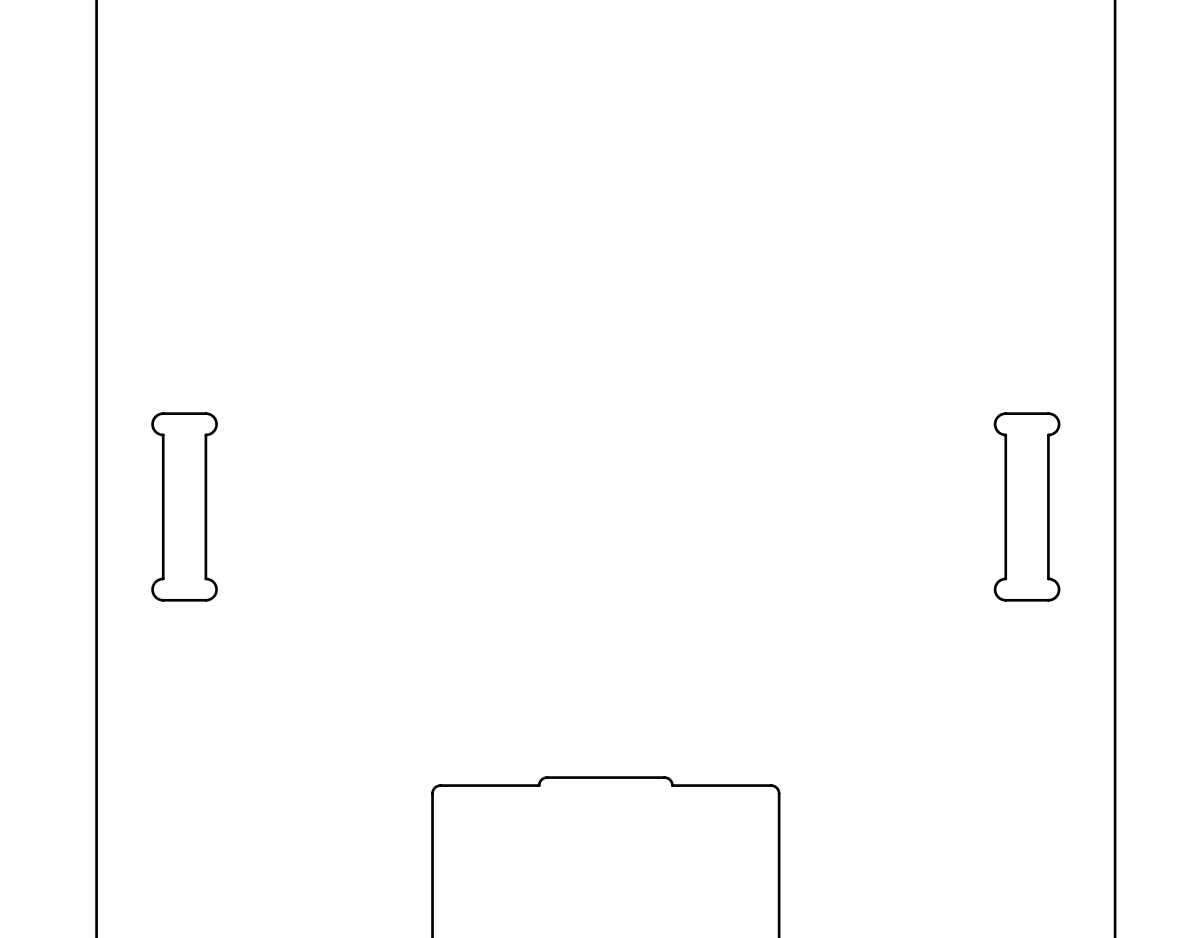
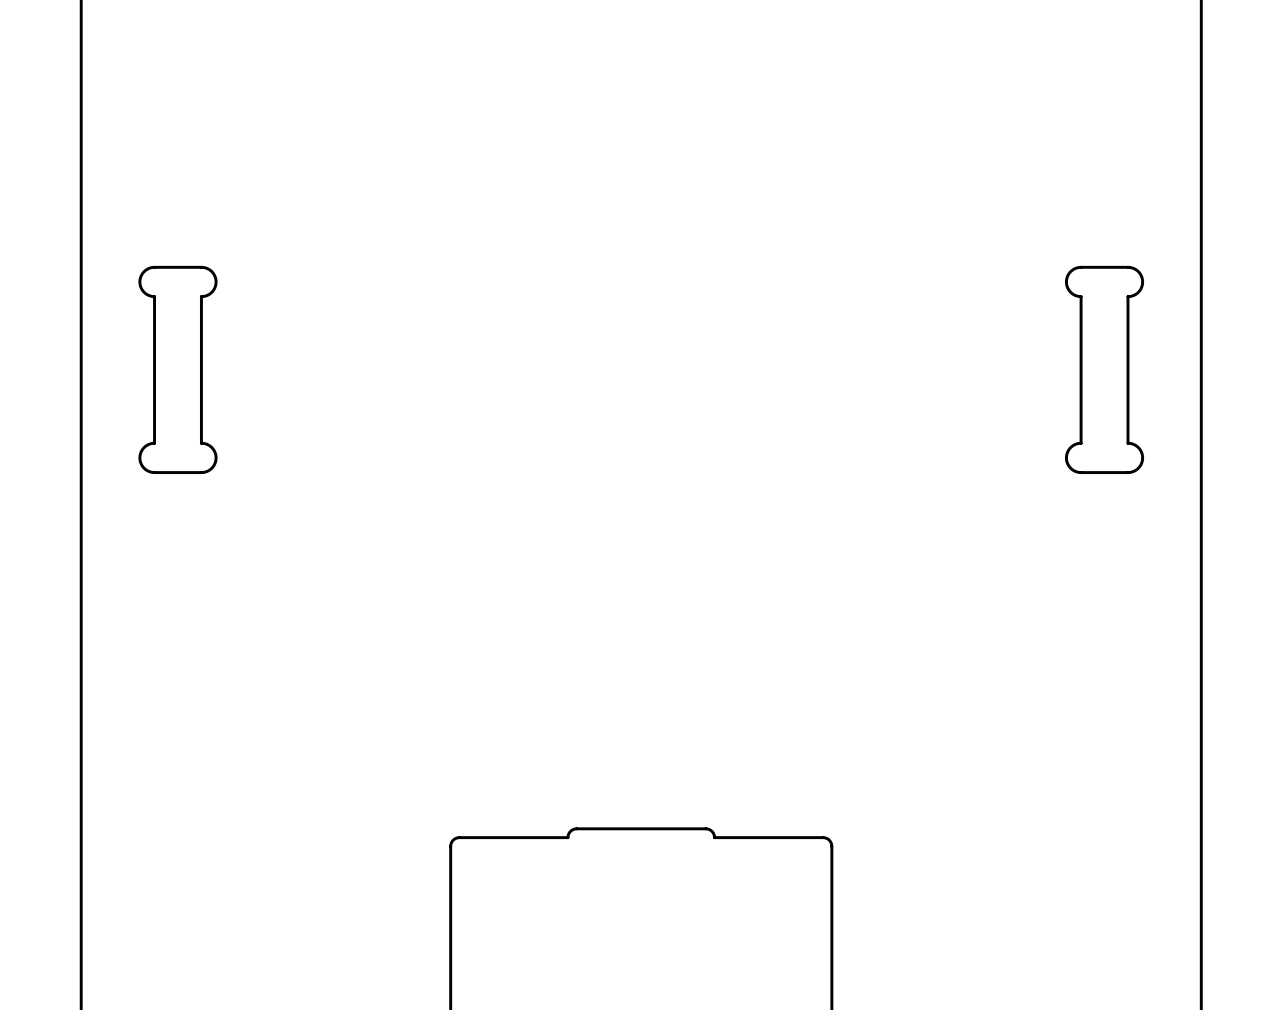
board edge: none -> (201, 267) (152, 267) (145, 270) (140, 278) (142, 290) (154, 296) (154, 443) (144, 447) (139, 457) (142, 466) (150, 472) (203, 472) (210, 469) (215, 461) (213, 448) (201, 443) (201, 296) (211, 292) (215, 280) (210, 270) (201, 267)
board edge: none -> (1128, 267) (1079, 267) (1072, 270) (1066, 278) (1069, 290) (1081, 296) (1081, 443) (1070, 447) (1066, 457) (1069, 466) (1077, 472) (1129, 472) (1136, 469) (1142, 461) (1139, 448) (1128, 443) (1128, 296) (1138, 292) (1142, 280) (1136, 270) (1128, 267)
board edge: (205, 413) (161, 413) (155, 416) (152, 421) (154, 430) (163, 434) (163, 578) (155, 582) (152, 589) (154, 596) (160, 599) (207, 600) (212, 598) (216, 592) (214, 583) (205, 578) (205, 434) (213, 431) (216, 424) (213, 416) (205, 413) -> none
board edge: (1048, 413) (1004, 413) (998, 416) (995, 421) (997, 430) (1005, 434) (1005, 578) (998, 582) (995, 589) (997, 596) (1002, 599) (1049, 600) (1054, 598) (1058, 592) (1056, 583) (1048, 578) (1048, 434) (1055, 431) (1059, 424) (1055, 416) (1048, 413) -> none

